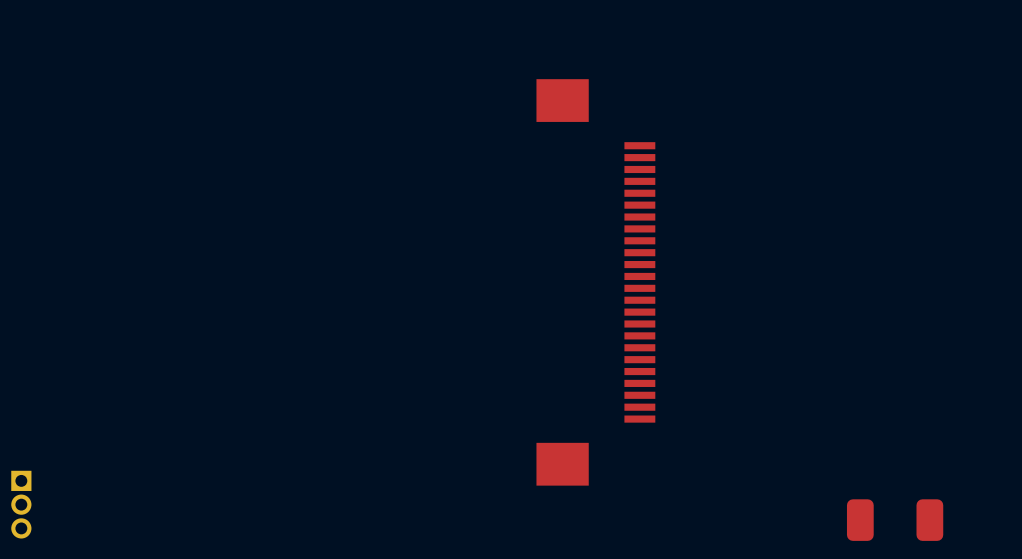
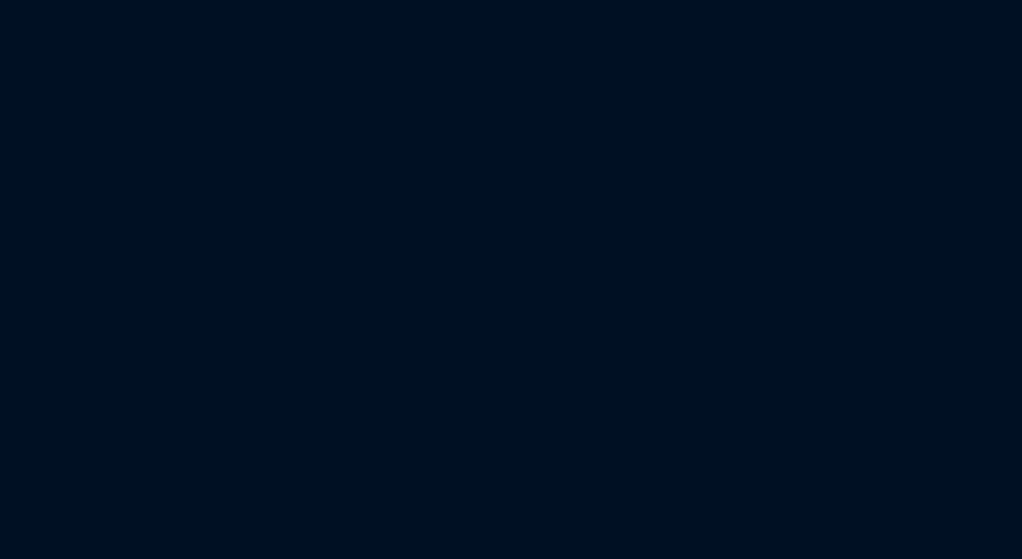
part: (595, 282) -> none
part: (21, 504) -> none
part: (895, 520) -> none

